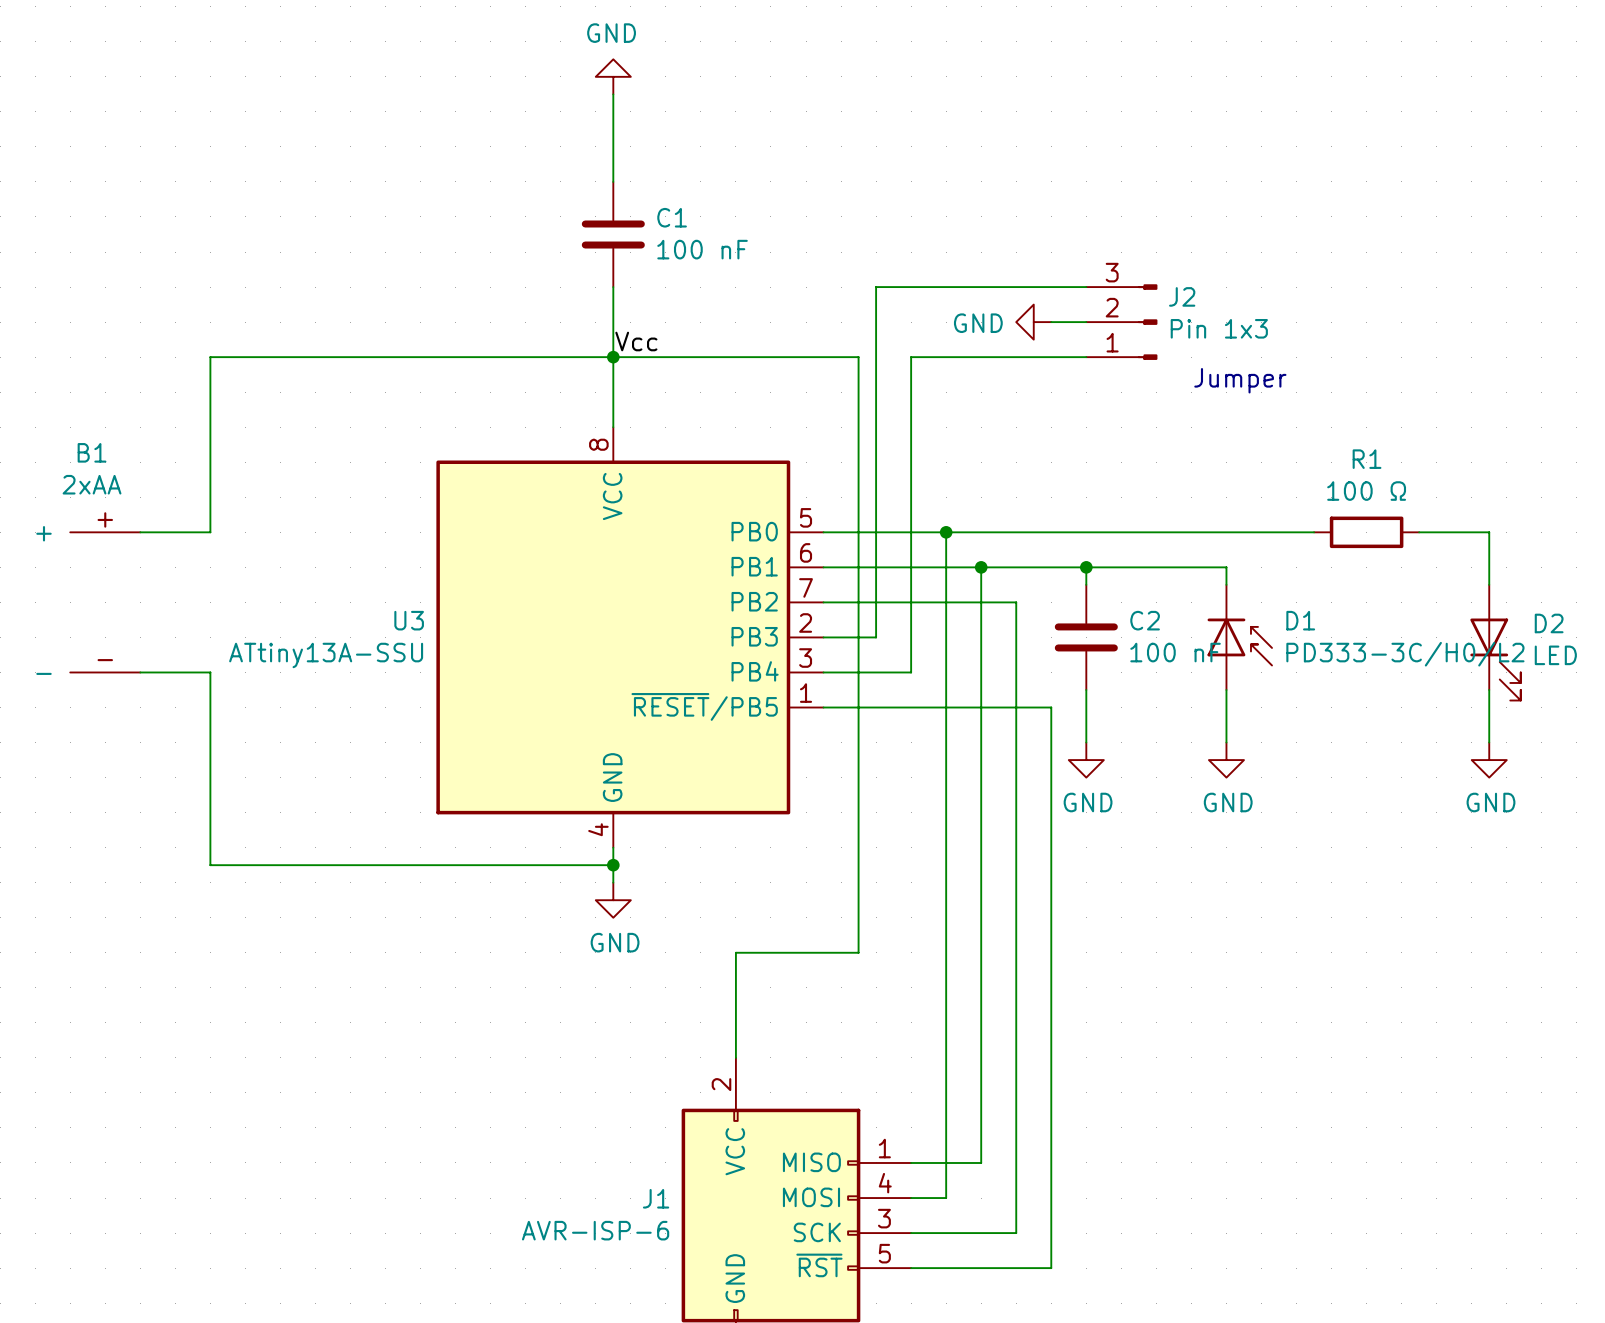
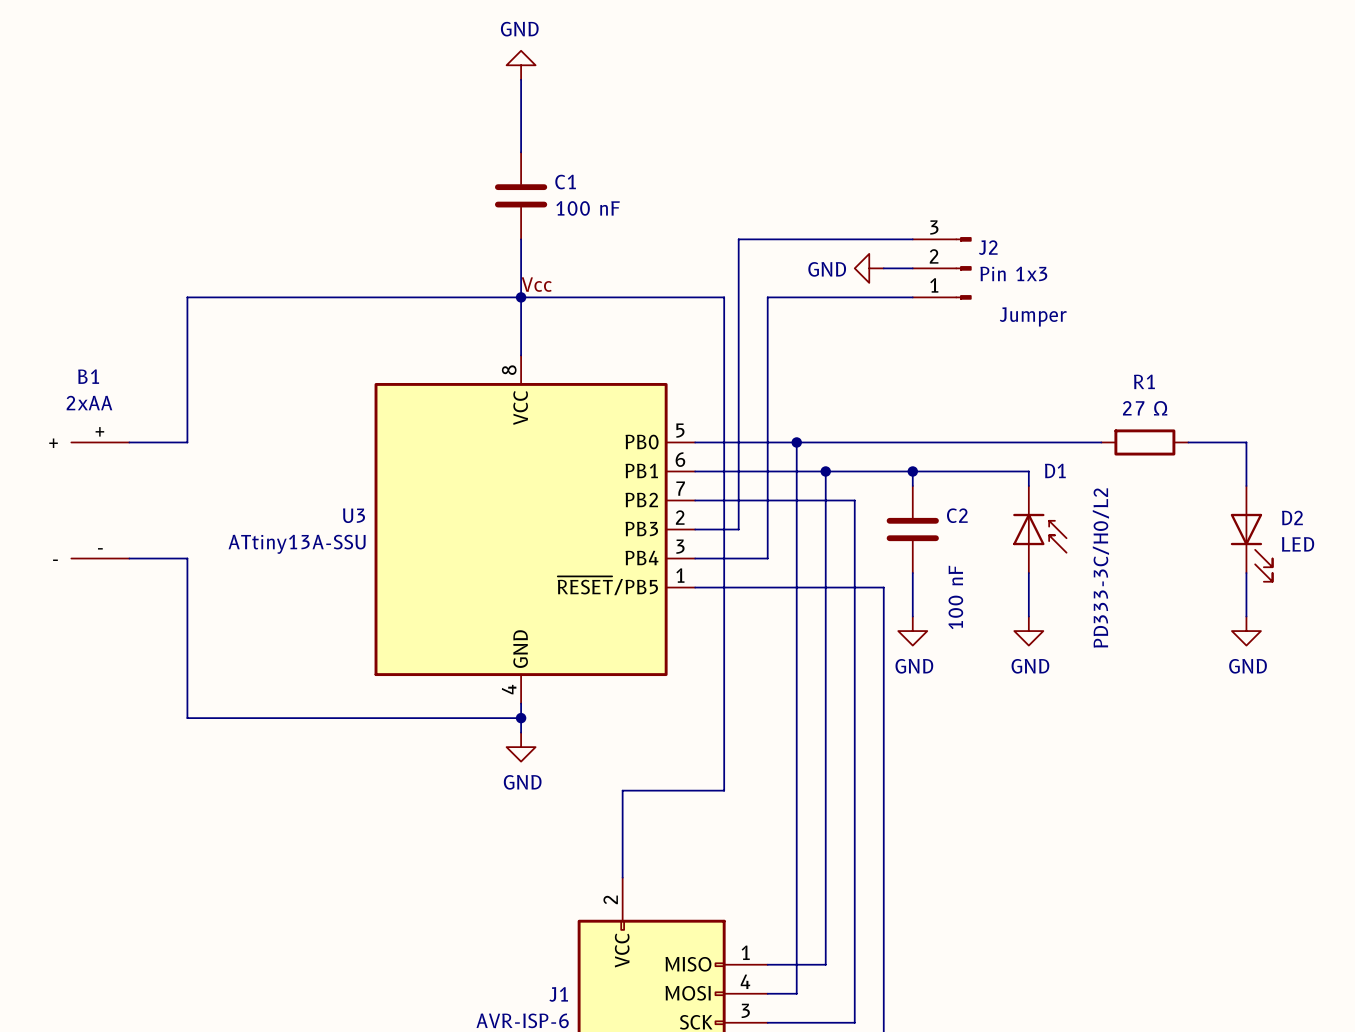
R1 value: 100 Ω (1366, 491) -> 27 Ω (1145, 408)
D1 name position: D1 (1300, 620) -> D1 (1055, 470)
C2 value rotation: 0° (1175, 652) -> 90° counterclockwise (955, 597)
D1 value rotation: 0° (1405, 654) -> 90° counterclockwise (1100, 568)

